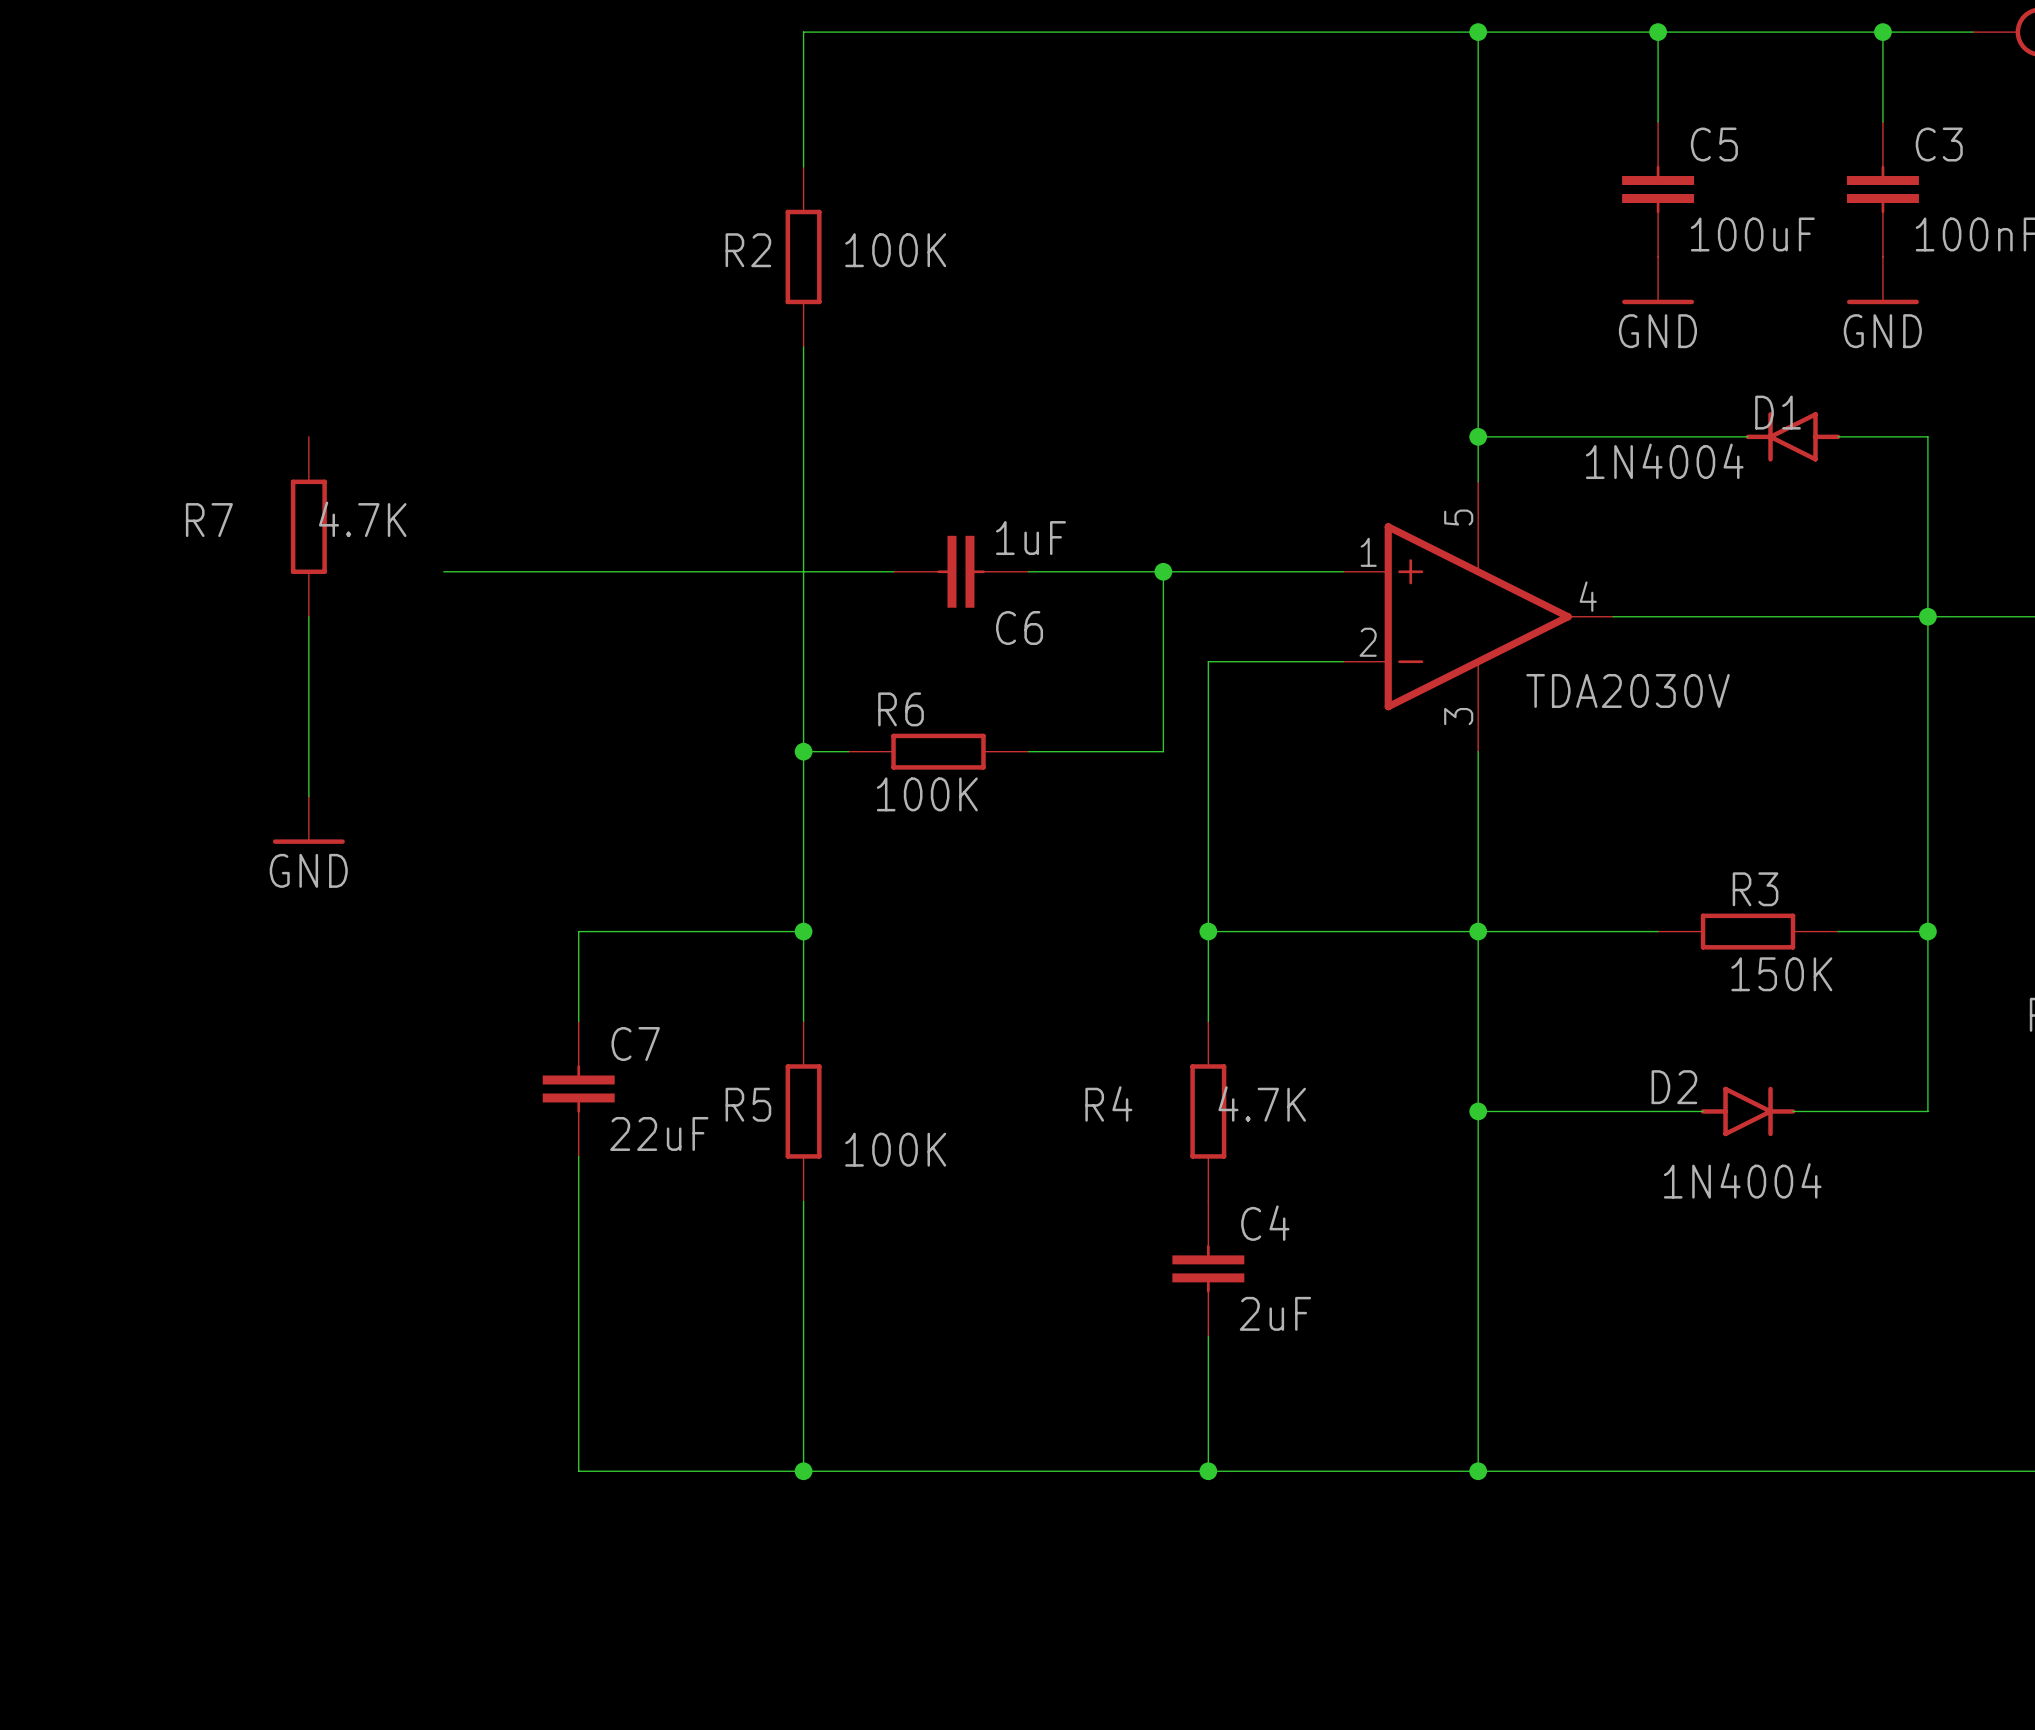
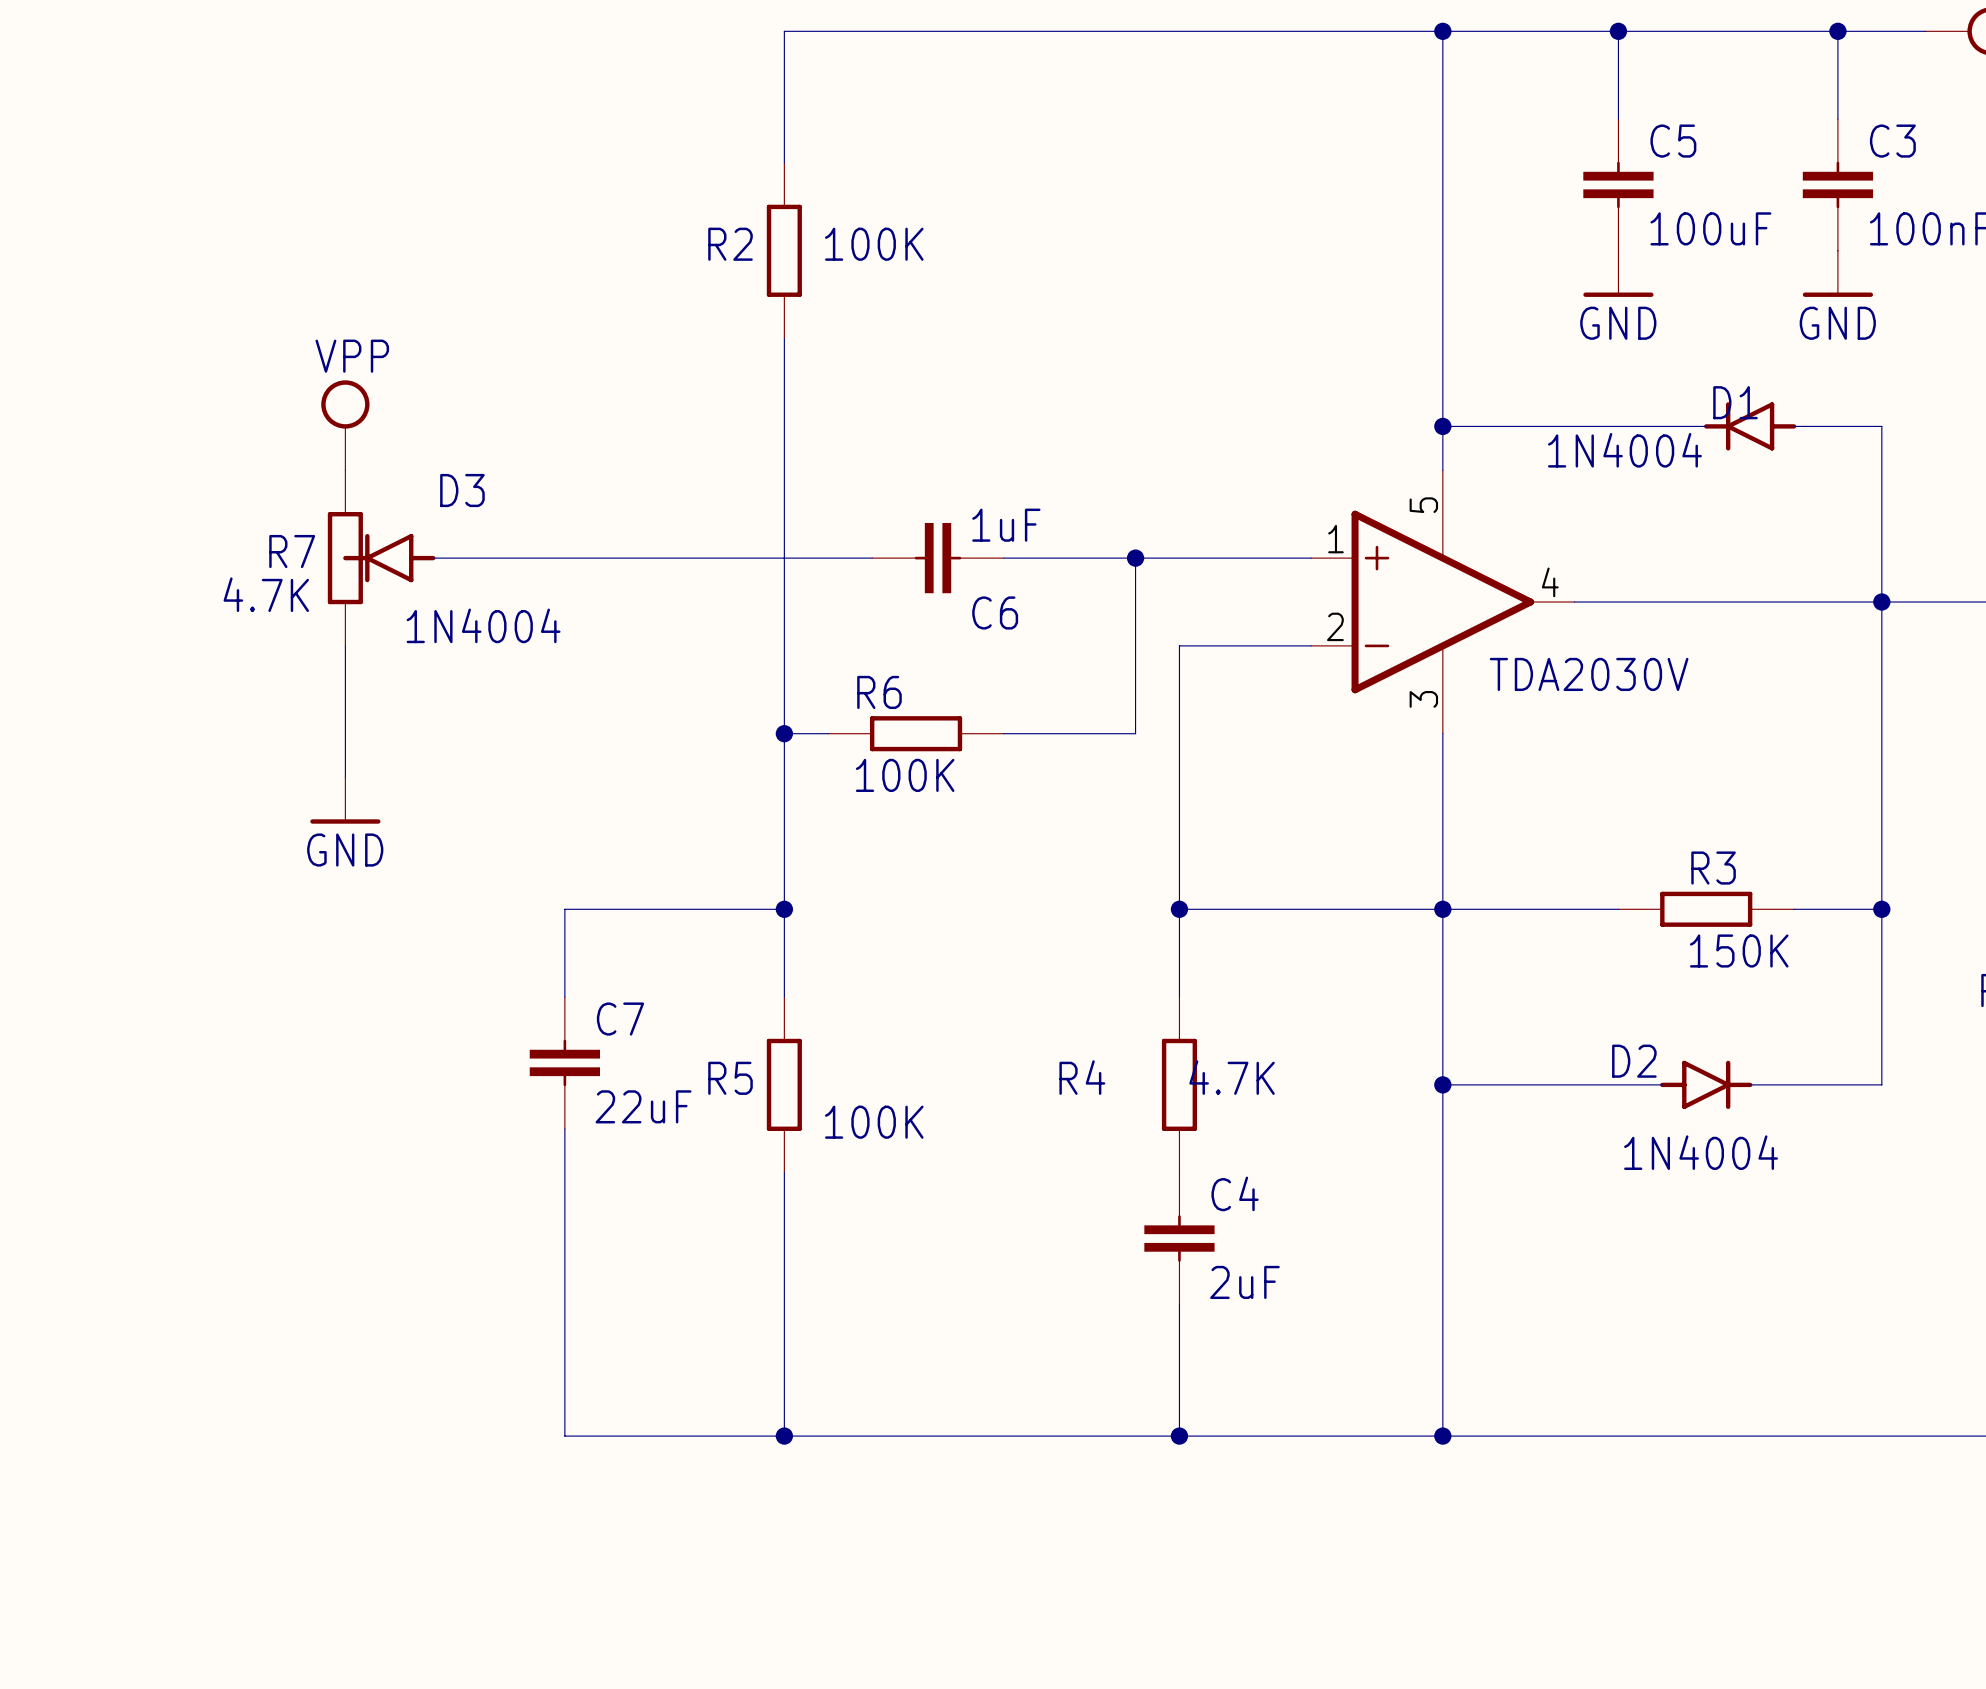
power symbol: none -> VPP (345, 425)
R7 value position: 4.7K (362, 519) -> 4.7K (266, 594)
R7 name position: R7 (209, 520) -> R7 (292, 551)
R7 position: (308, 526) -> (345, 558)
D3: none -> 1N4004 (389, 558)
wire: (308, 616) (308, 796) -> none
wire: none -> (345, 645) (345, 777)
power symbol position: GND (308, 820) -> GND (345, 800)

